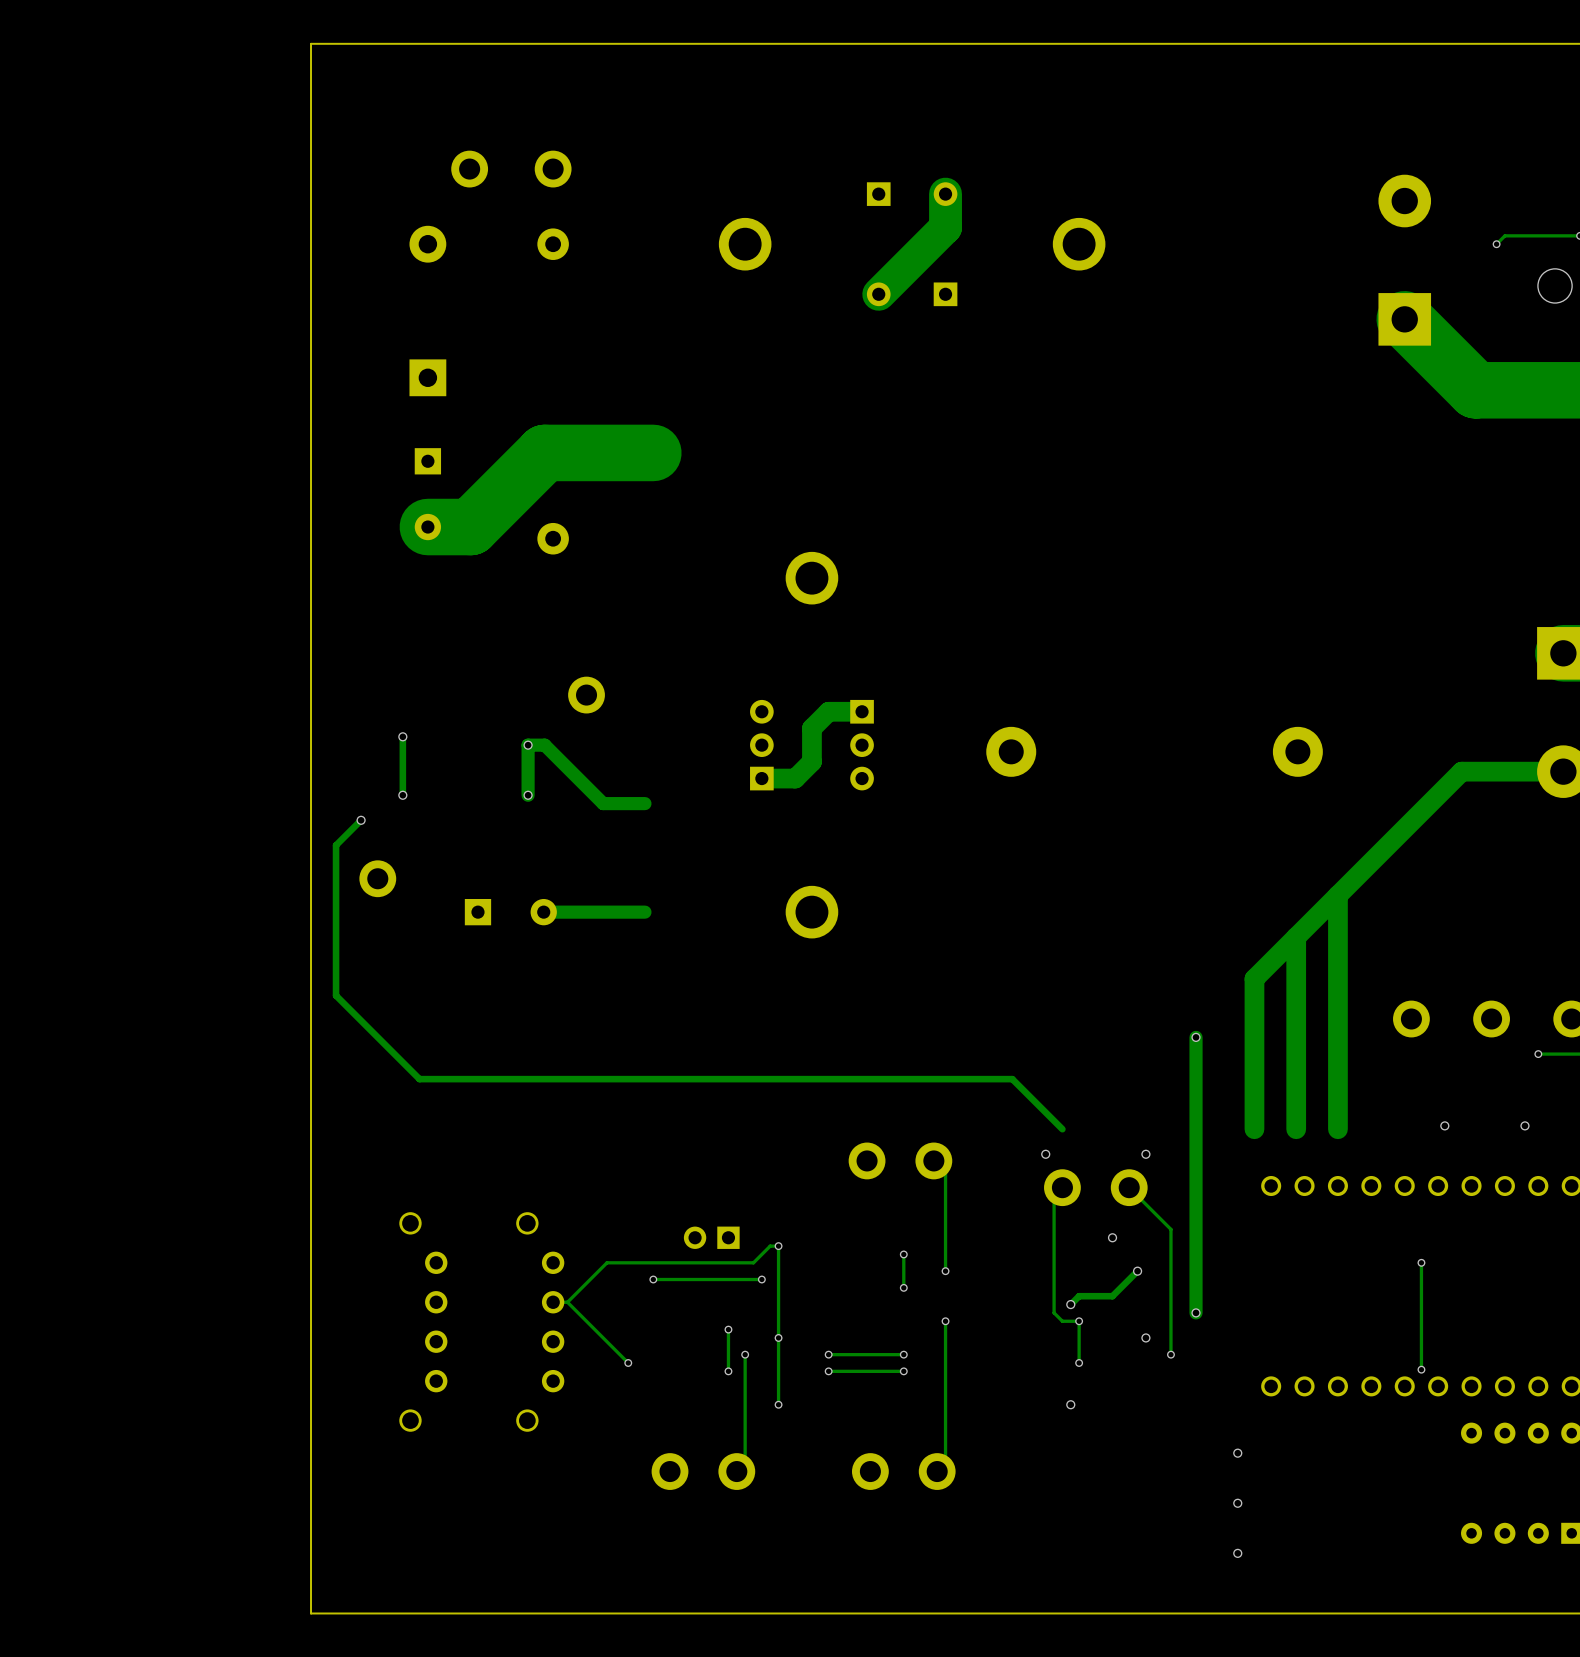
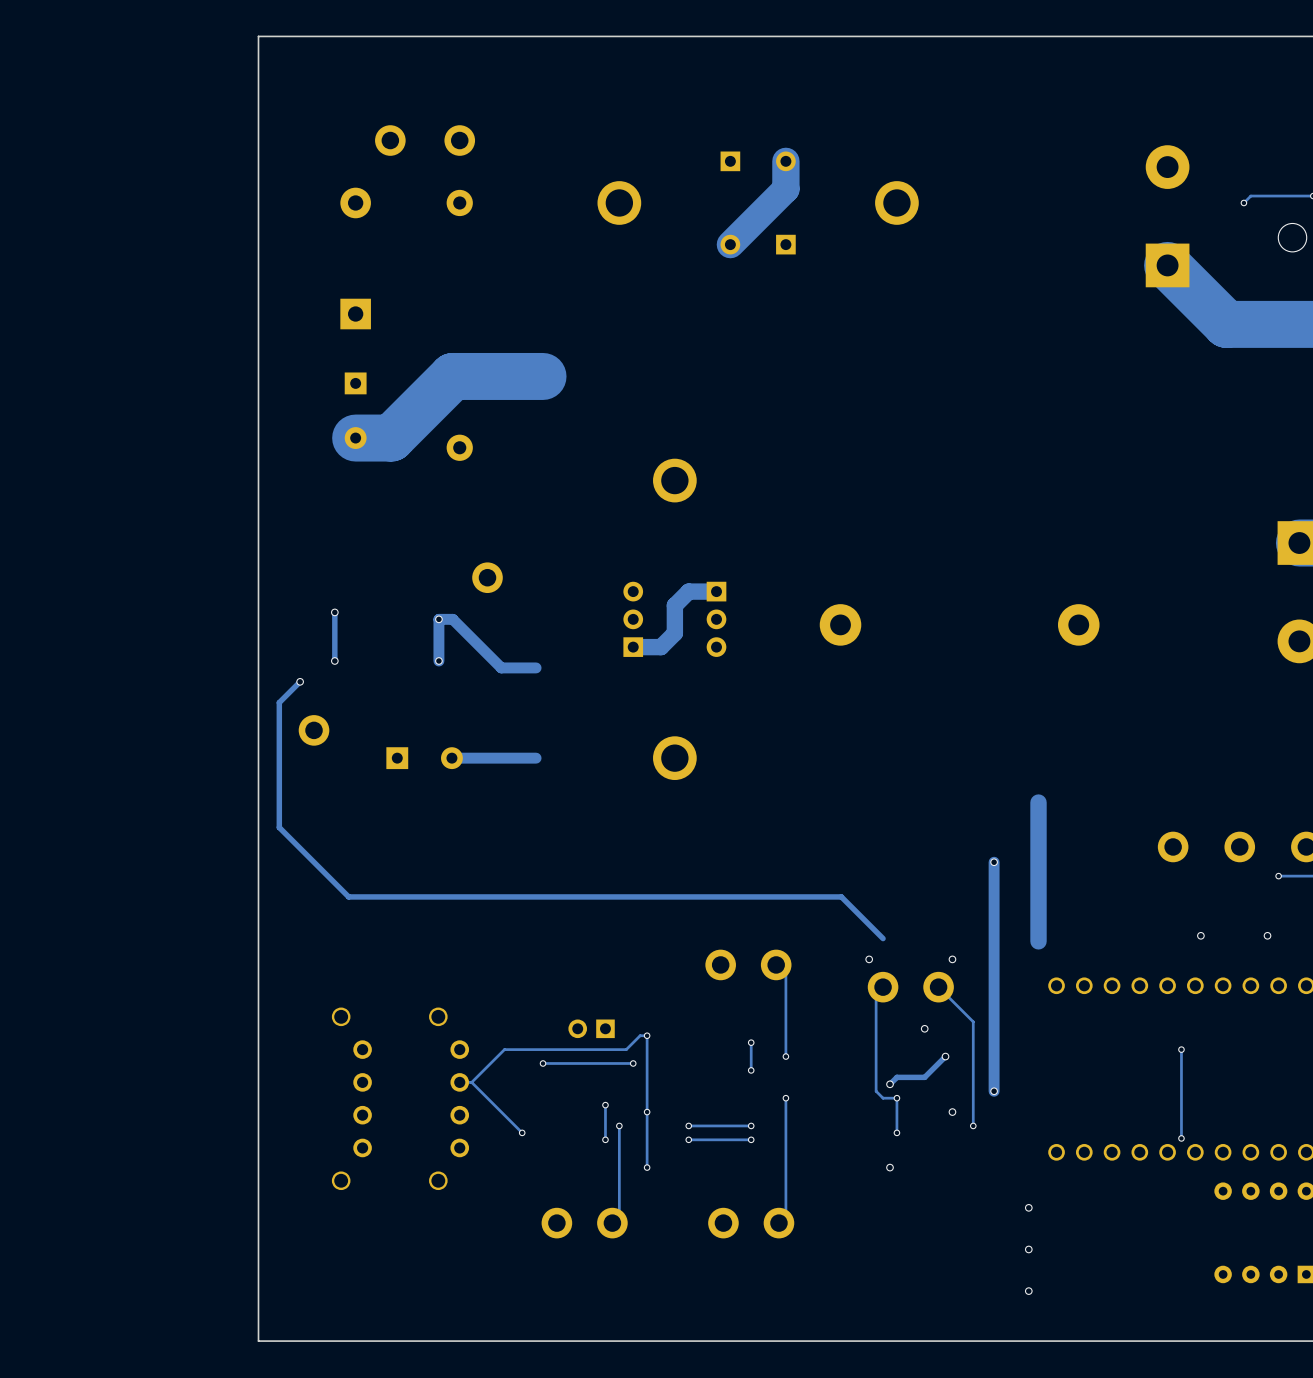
track: (1563, 771) (1461, 771) (1254, 978) (1254, 1129) -> none
track: (1337, 895) (1337, 1129) -> none
track: (1296, 937) (1296, 1129) -> none
track: none -> (1038, 802) (1038, 941)

